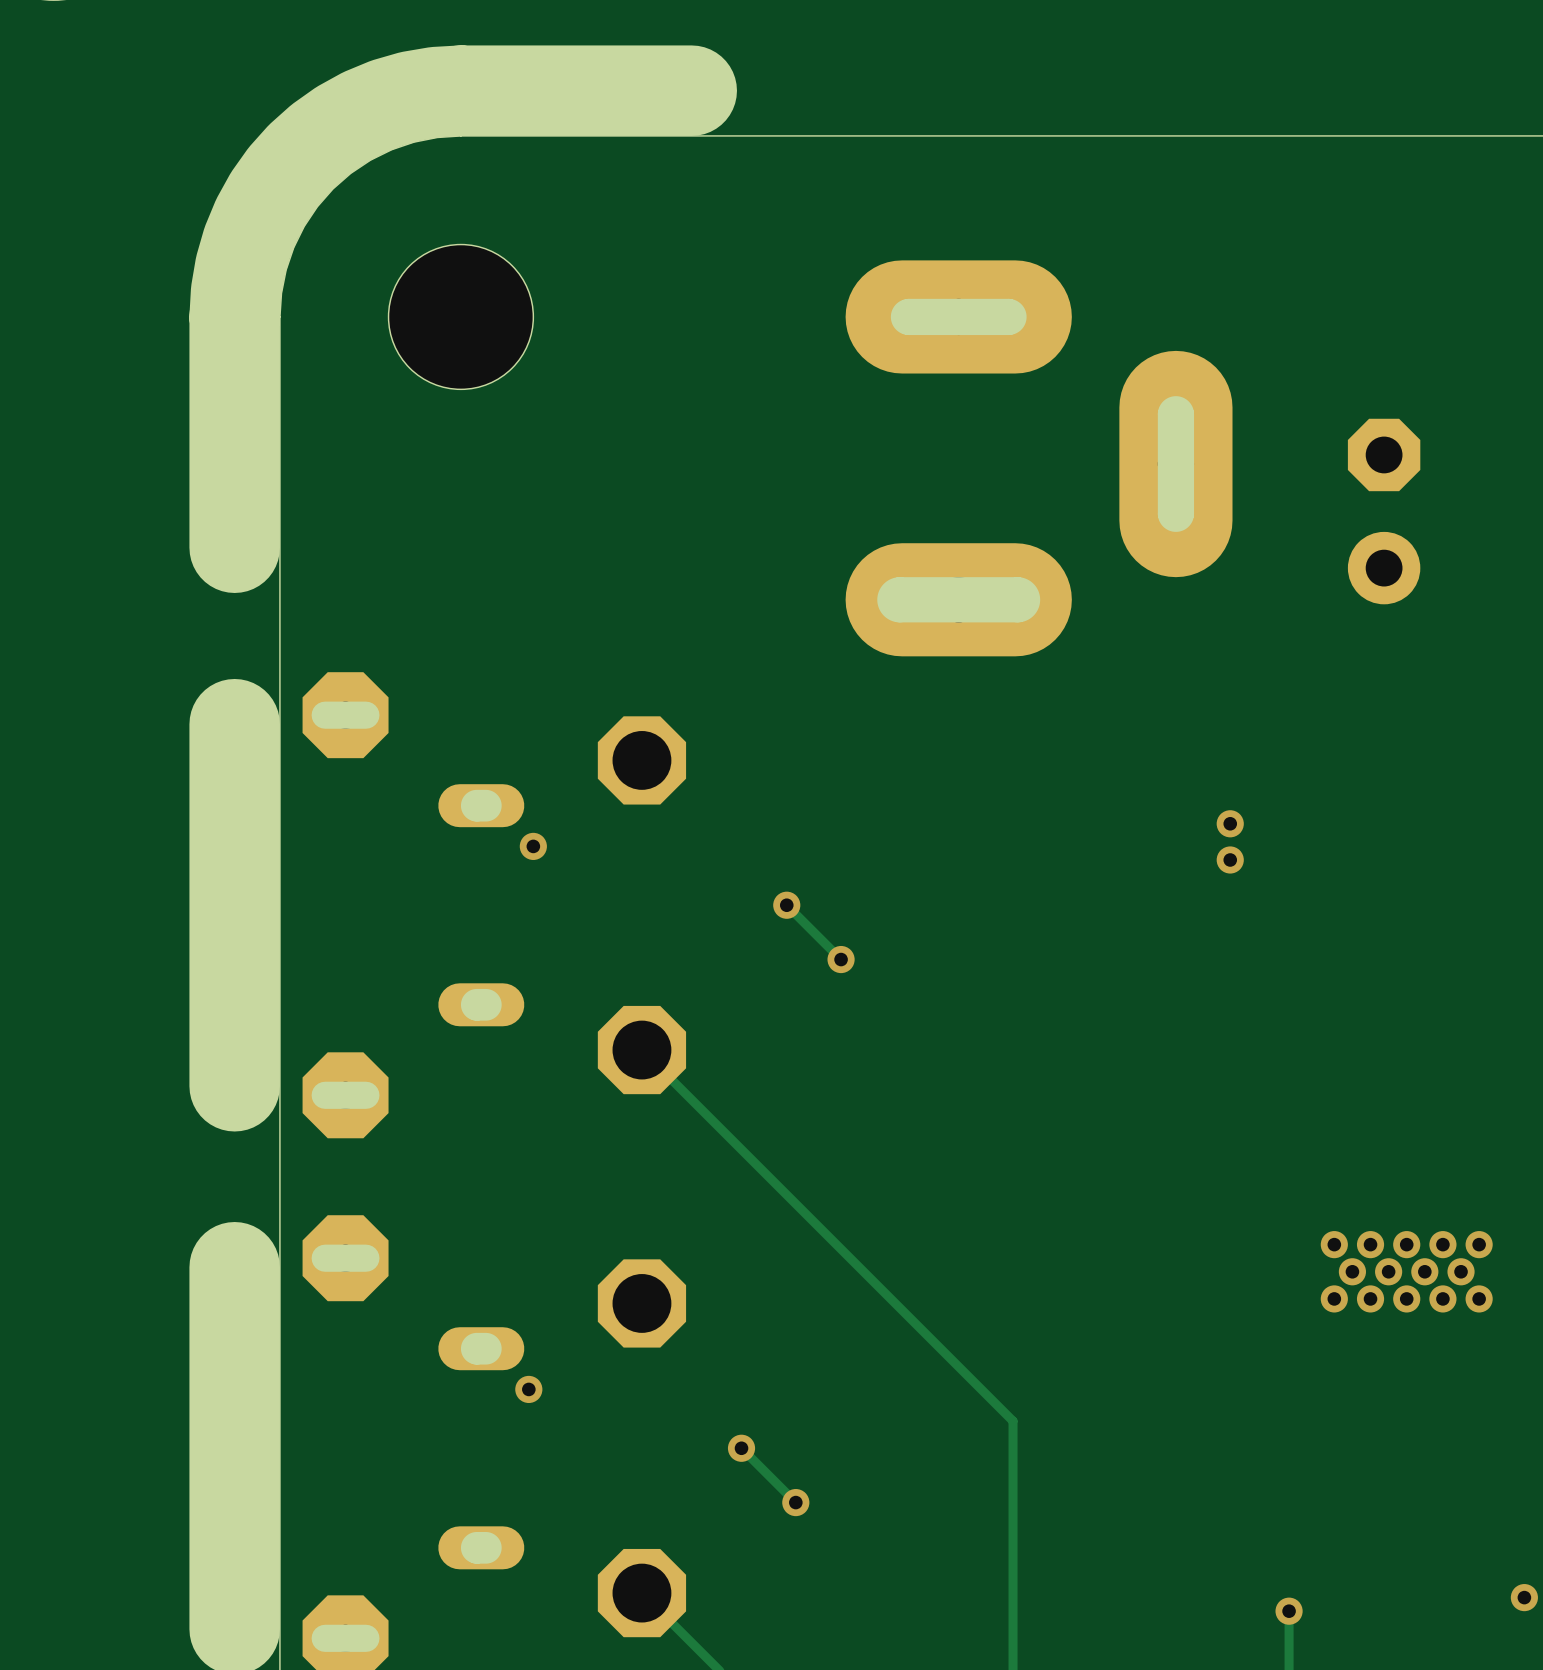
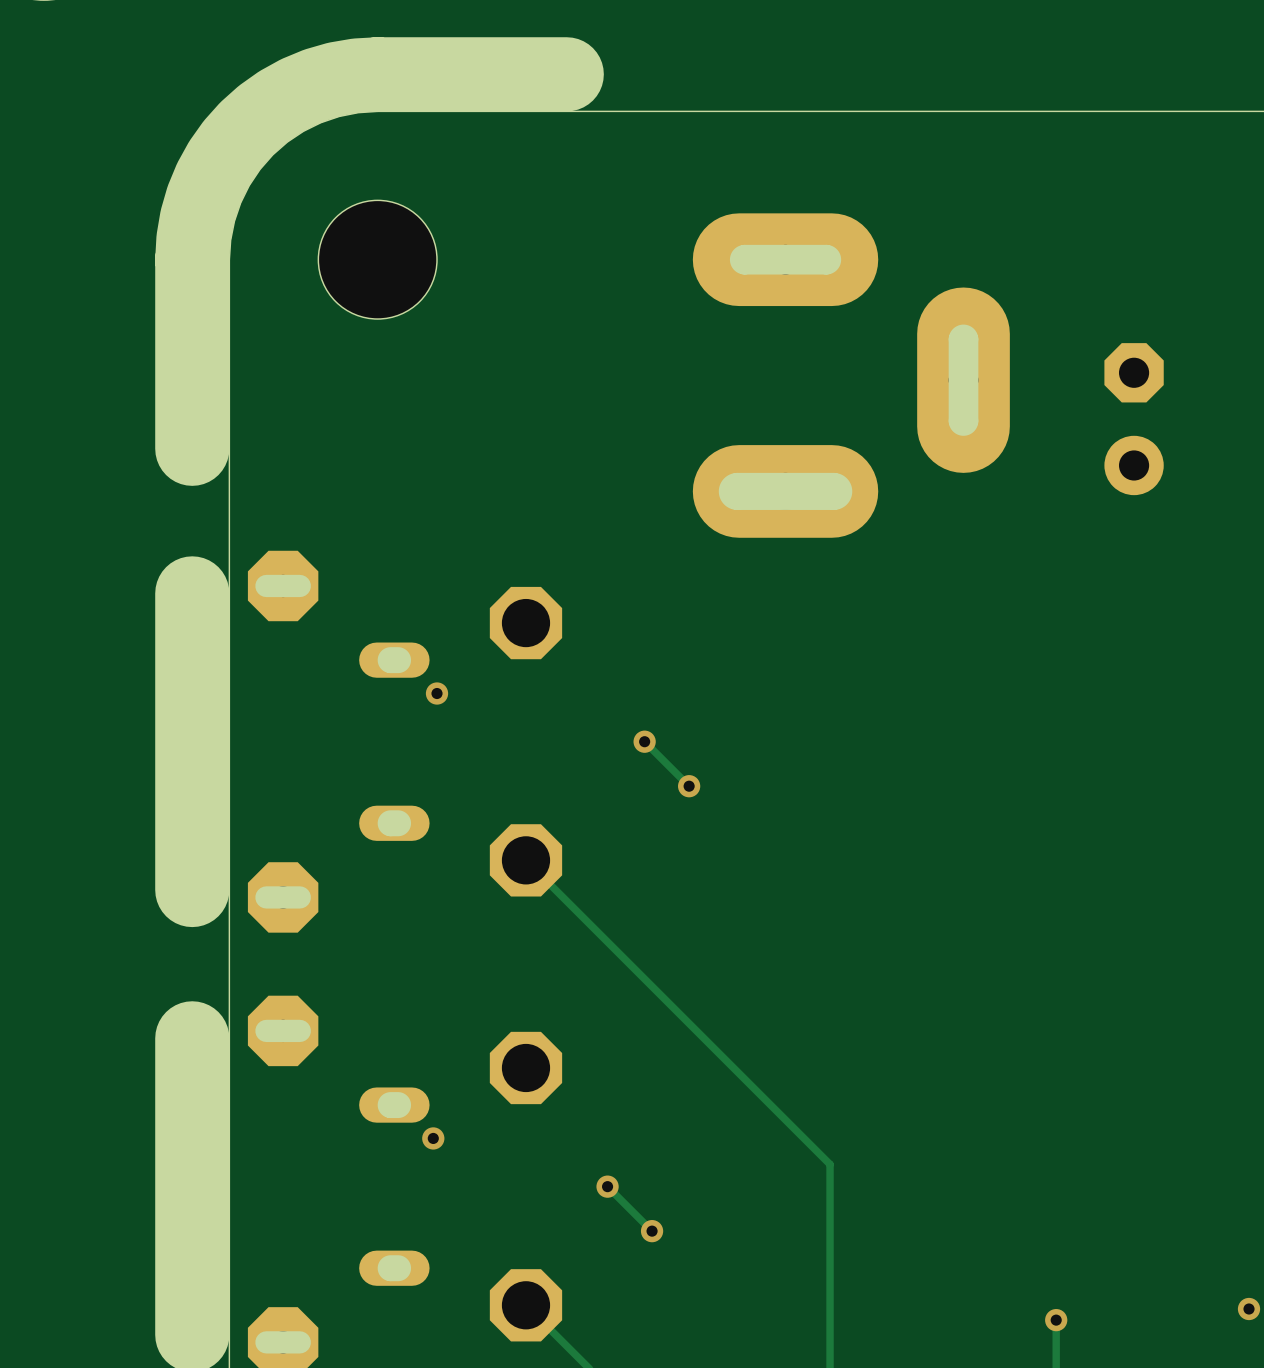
via: (1230, 823) -> none
via: (1230, 859) -> none
via: (1334, 1244) -> none
via: (1370, 1244) -> none
via: (1406, 1244) -> none
via: (1442, 1244) -> none
via: (1479, 1244) -> none
via: (1352, 1271) -> none
via: (1388, 1271) -> none
via: (1424, 1271) -> none
via: (1461, 1271) -> none
via: (1334, 1298) -> none
via: (1370, 1298) -> none
via: (1406, 1298) -> none
via: (1442, 1298) -> none
via: (1479, 1298) -> none

